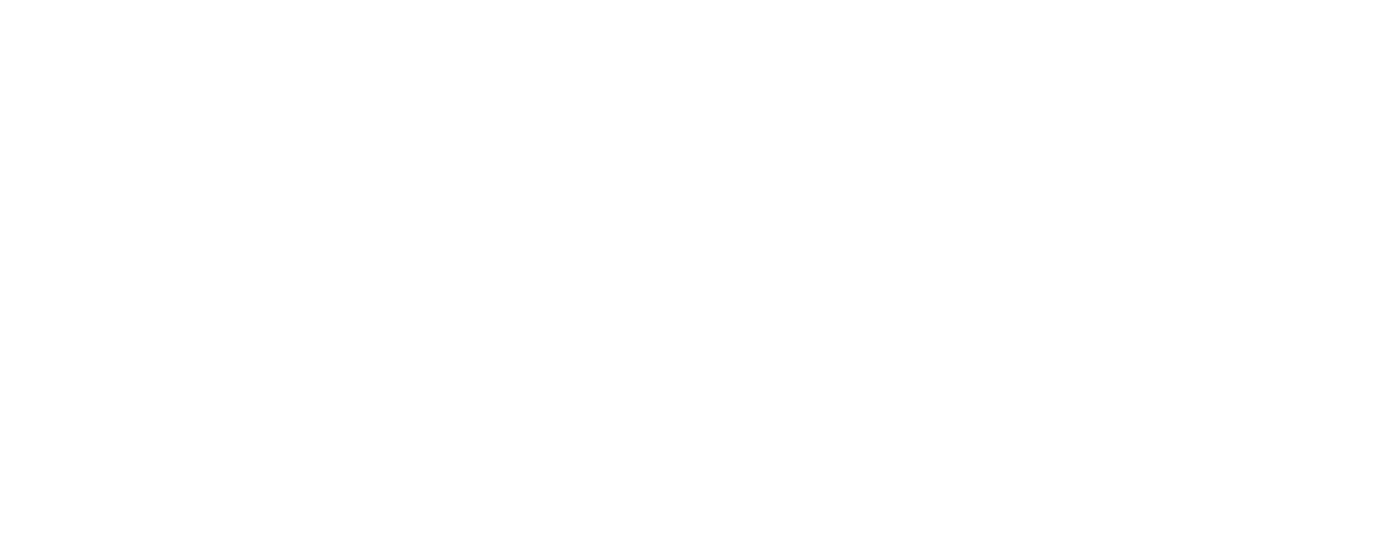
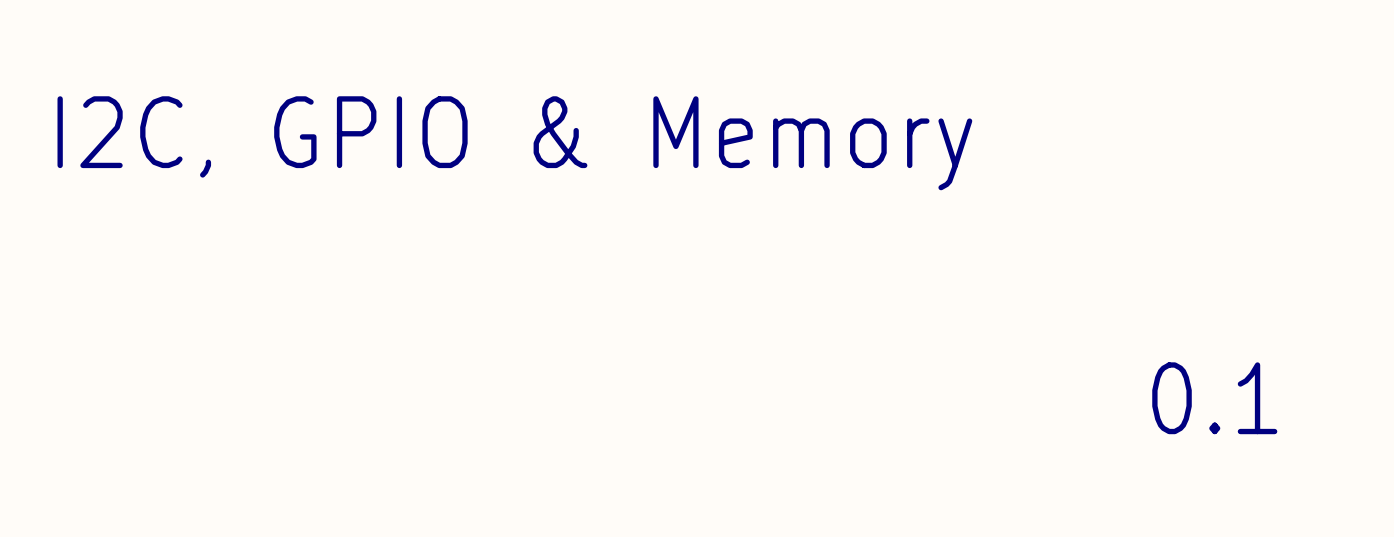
text: none -> I2C, GPIO & Memory (514, 143)
text: none -> 0.1 (1214, 398)

